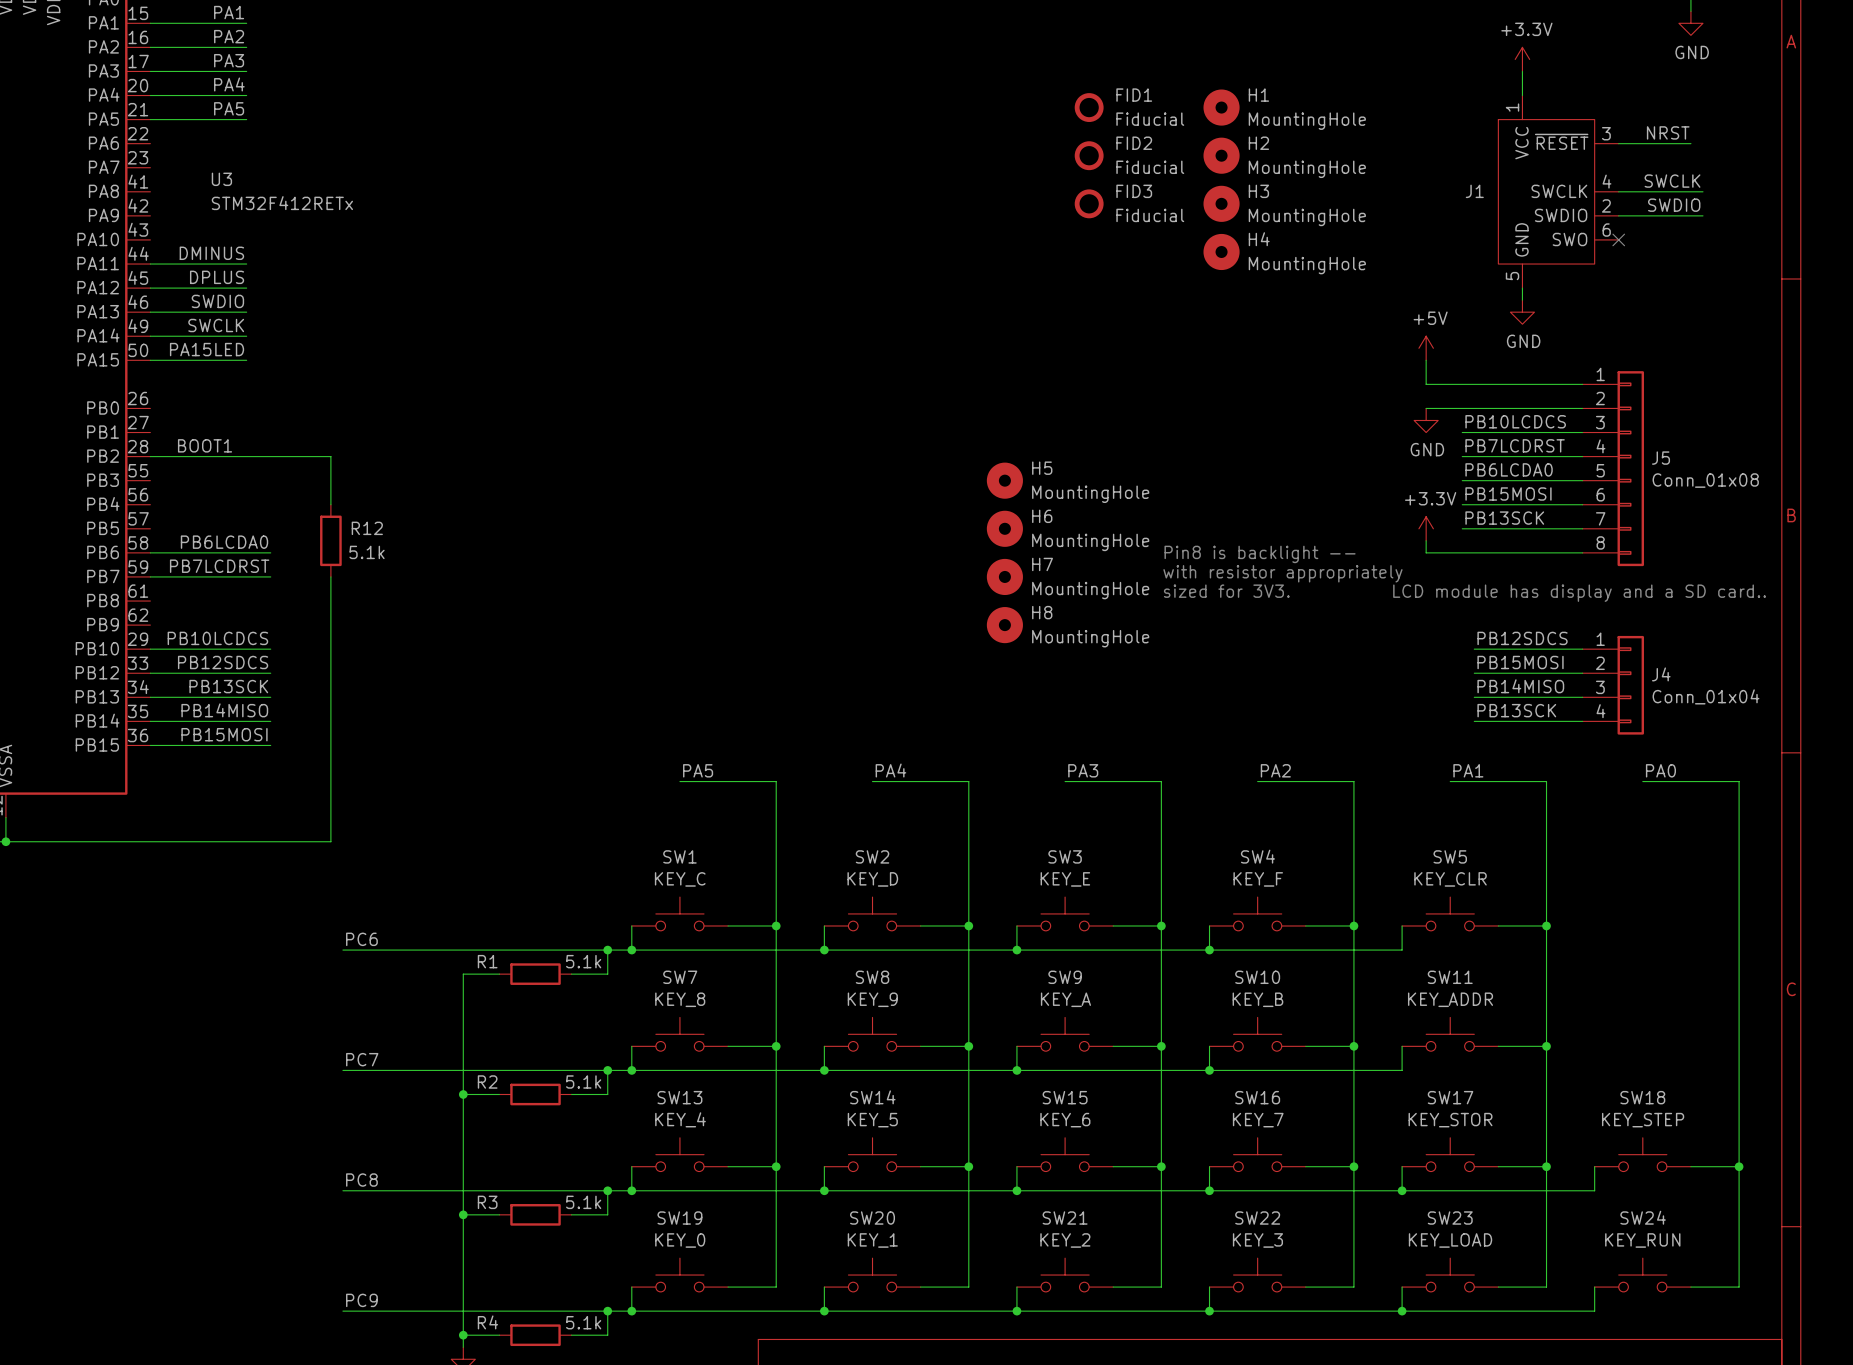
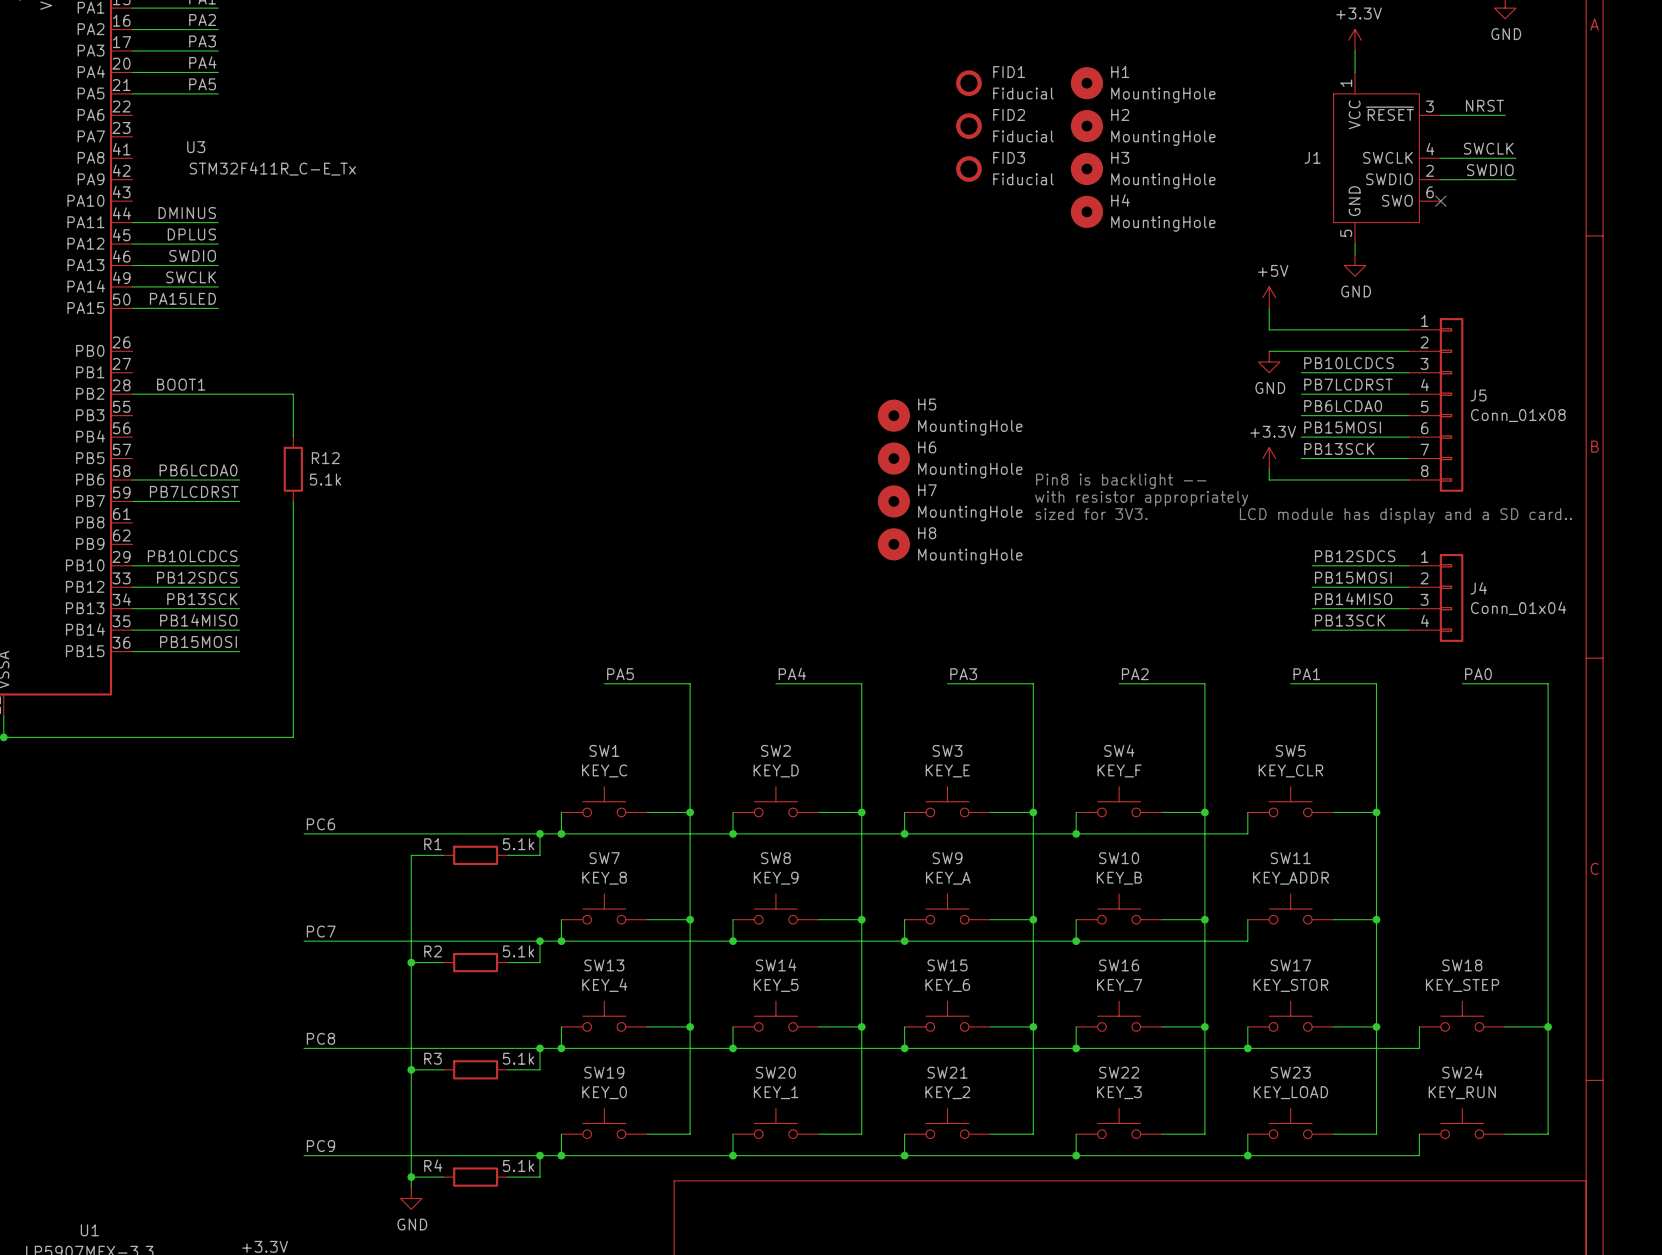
U3 value: STM32F412RETx (282, 203) -> STM32F411R_C-E_Tx (272, 168)

